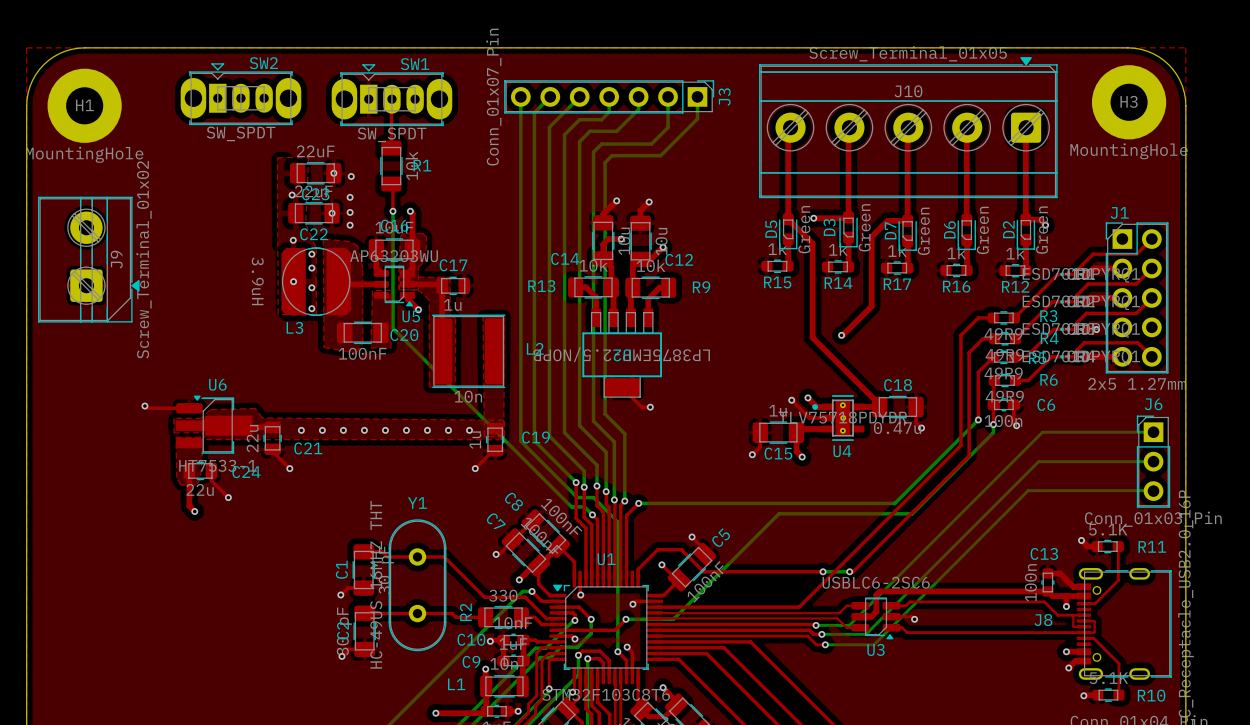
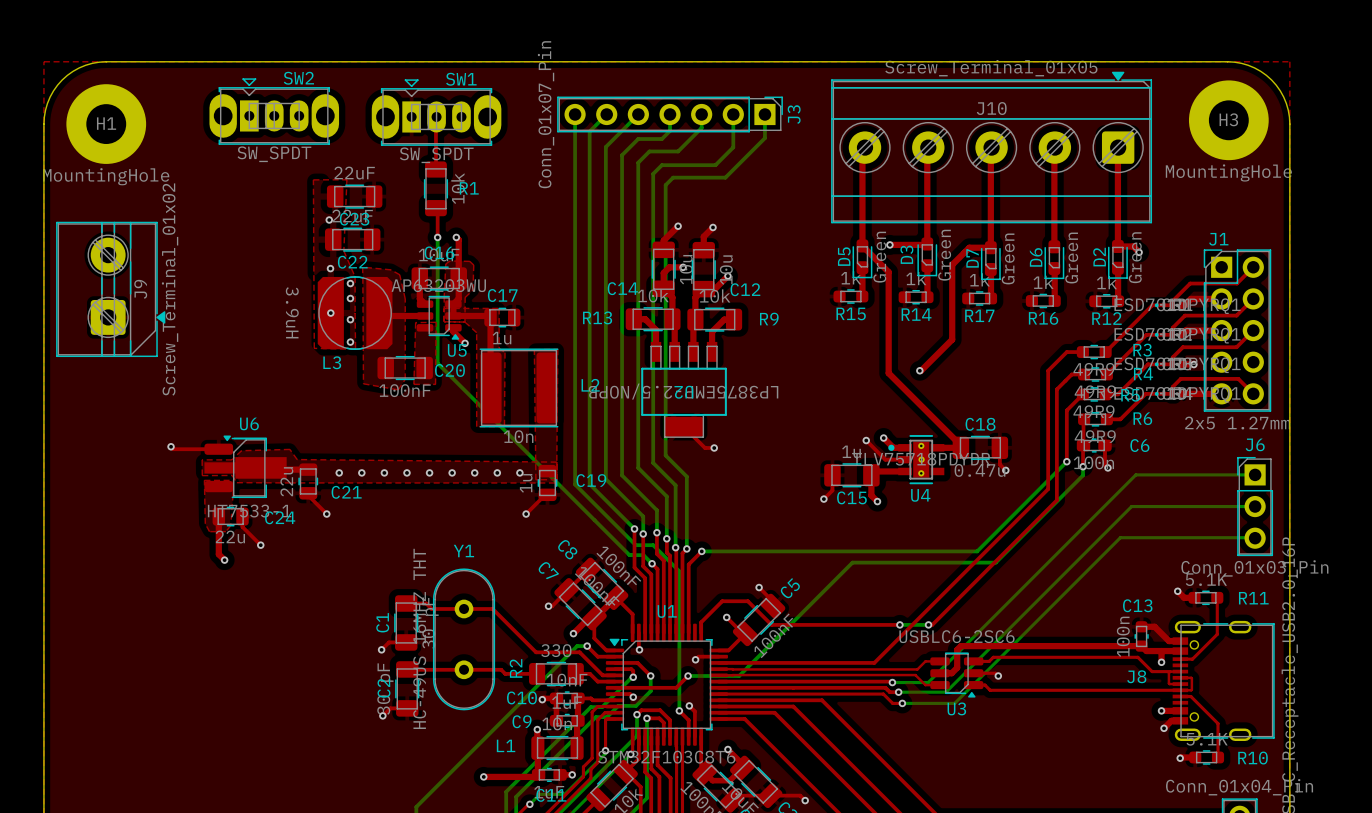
via: (333, 173) -> none
via: (351, 176) -> none
via: (350, 197) -> none
via: (350, 212) -> none
via: (332, 213) -> none
via: (350, 225) -> none

